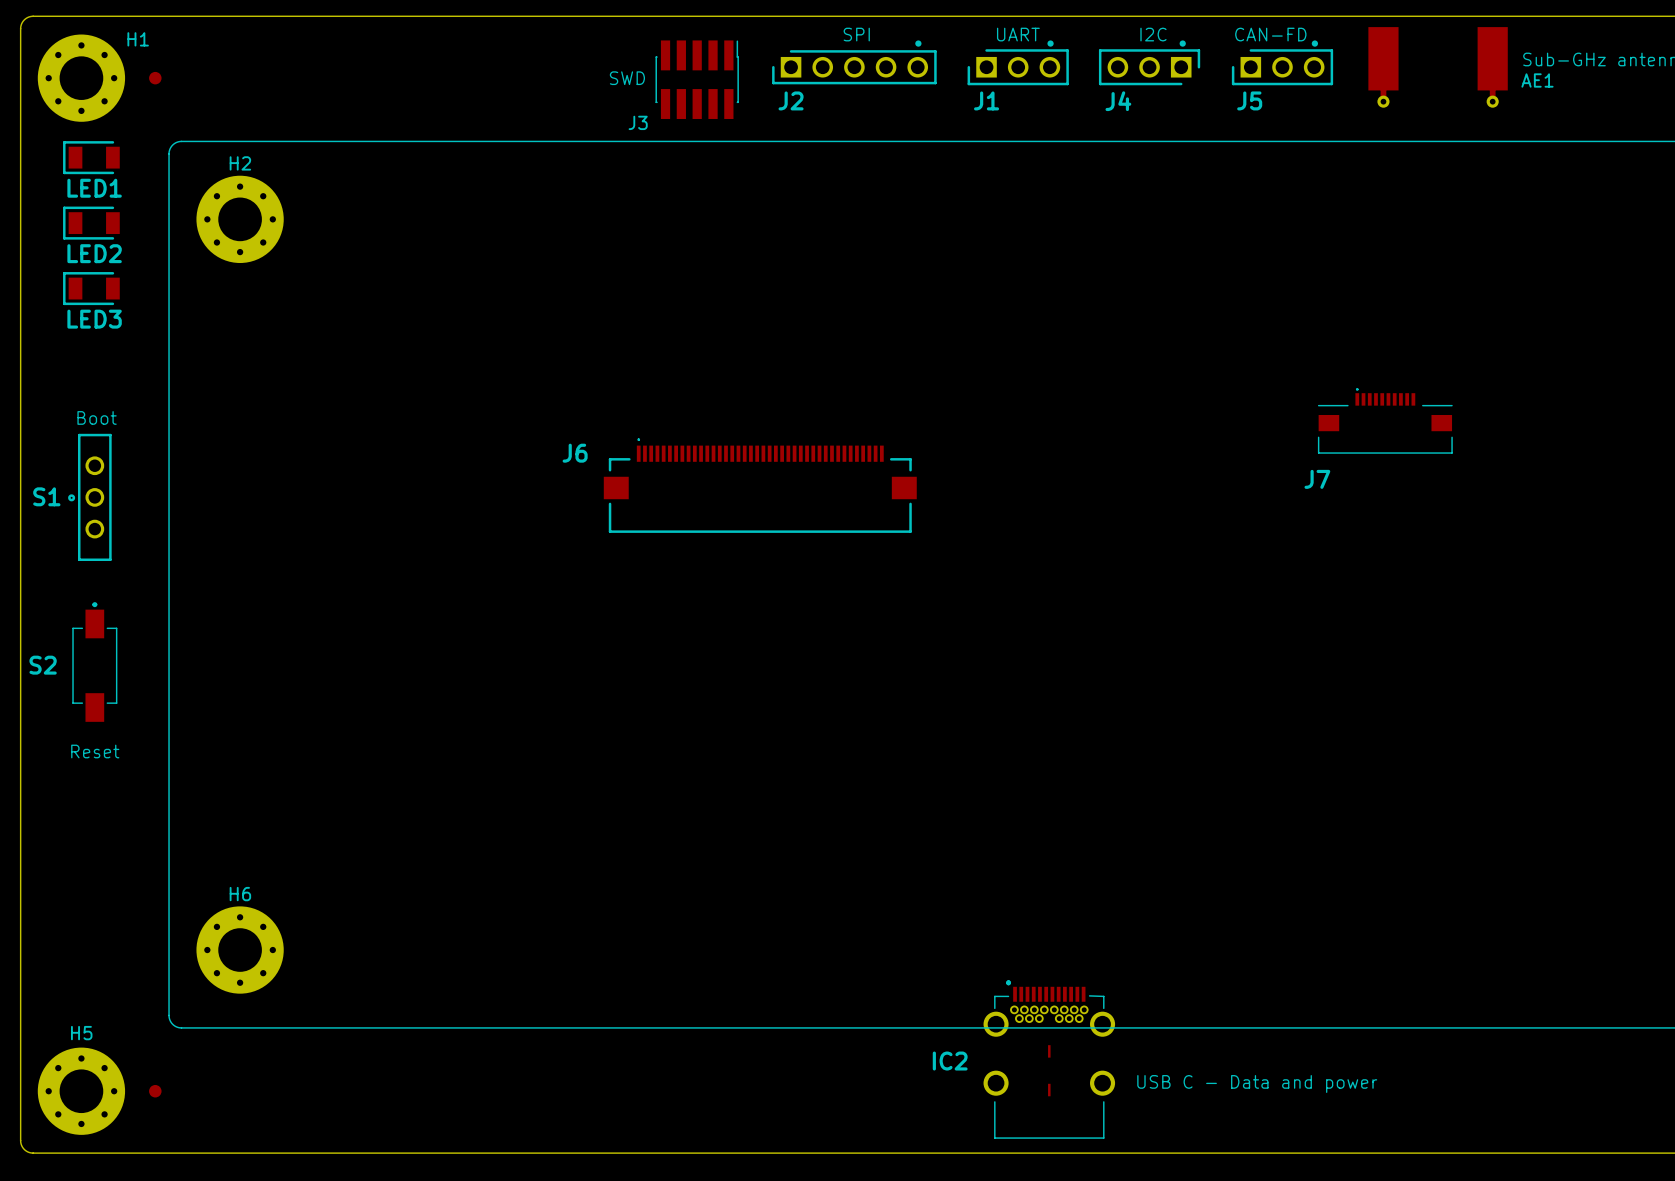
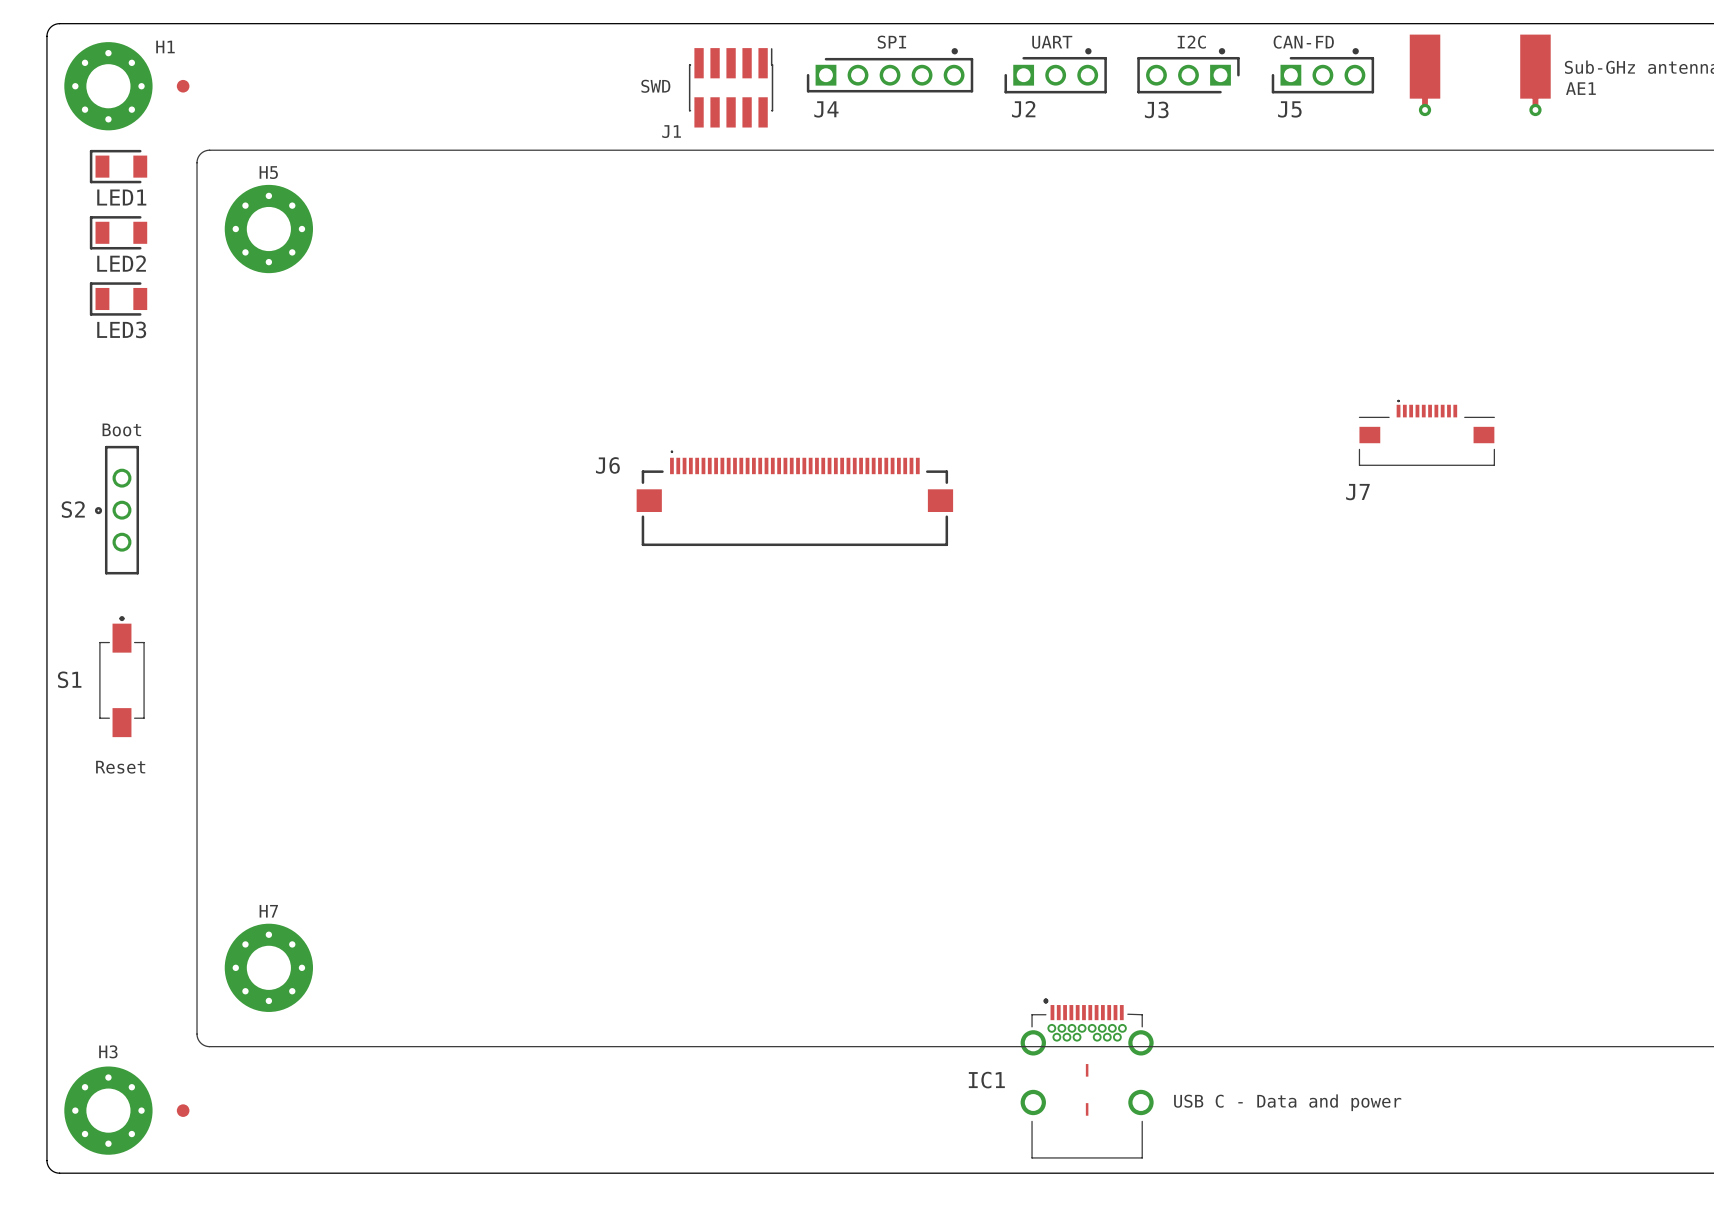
J2 name: J2 (791, 100) -> J4 (826, 109)
J1 name: J1 (986, 100) -> J2 (1023, 109)
J4 name: J4 (1118, 101) -> J3 (1156, 109)
J3 name: J3 (638, 122) -> J1 (671, 131)
H2 name: H2 (240, 163) -> H5 (268, 172)
S1 name: S1 (46, 496) -> S2 (73, 509)
S2 name: S2 (43, 665) -> S1 (69, 679)
H6 name: H6 (240, 894) -> H7 (268, 911)
H5 name: H5 (81, 1033) -> H3 (108, 1051)
IC2 name: IC2 (950, 1061) -> IC1 (986, 1080)

